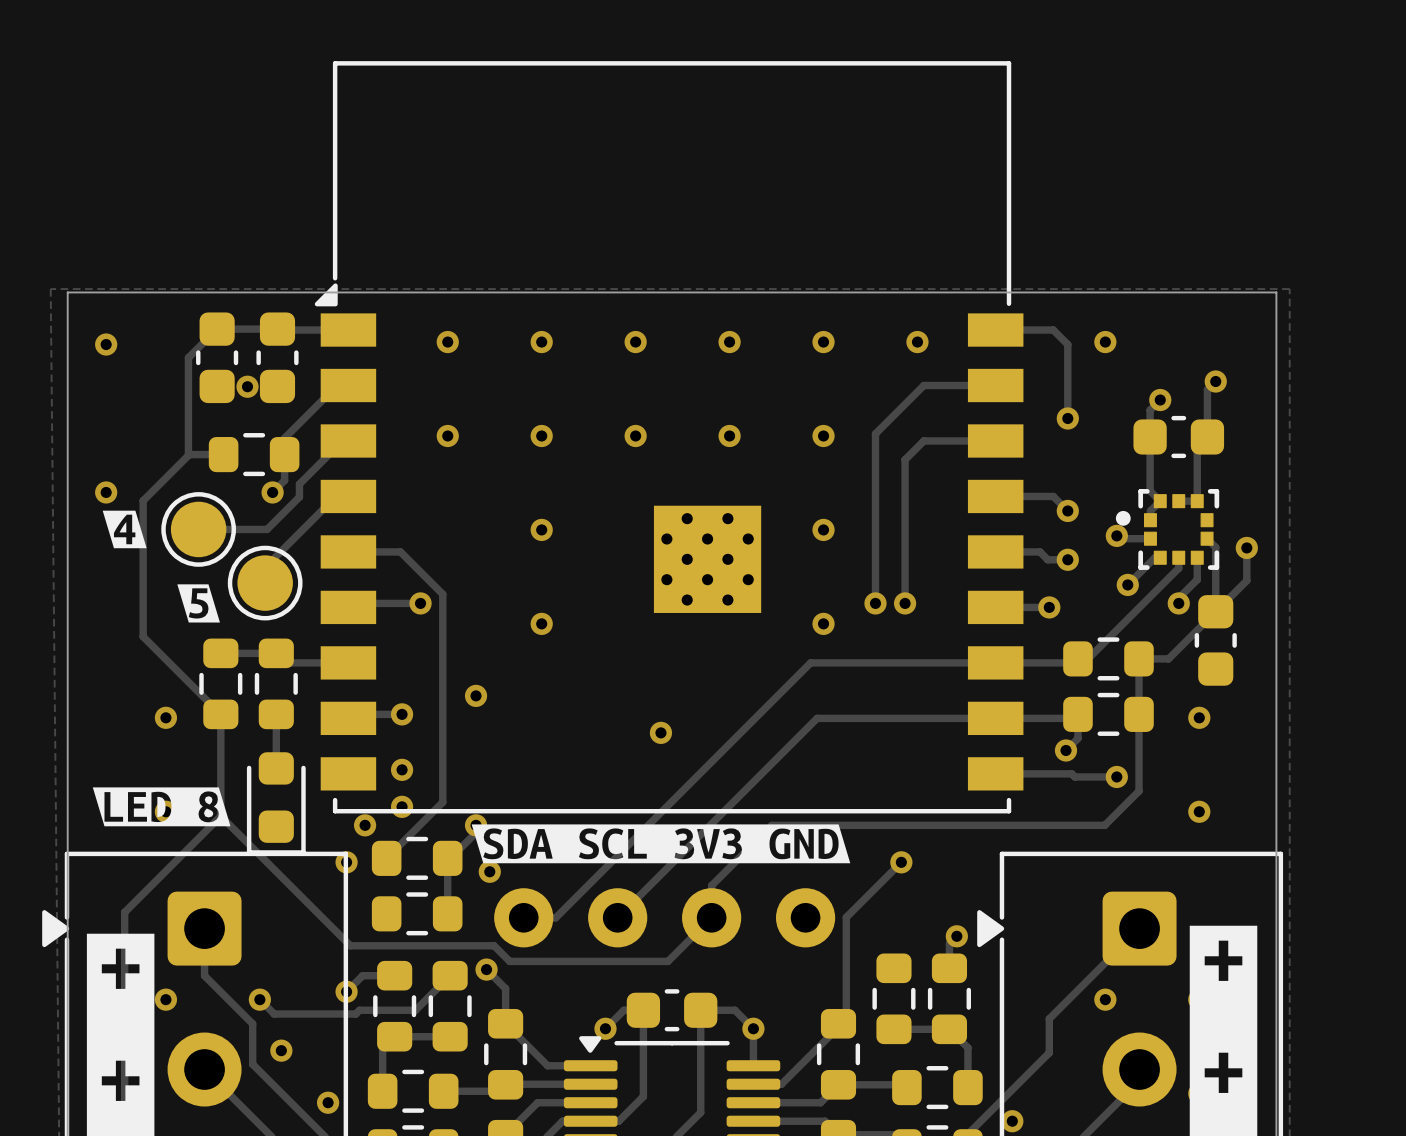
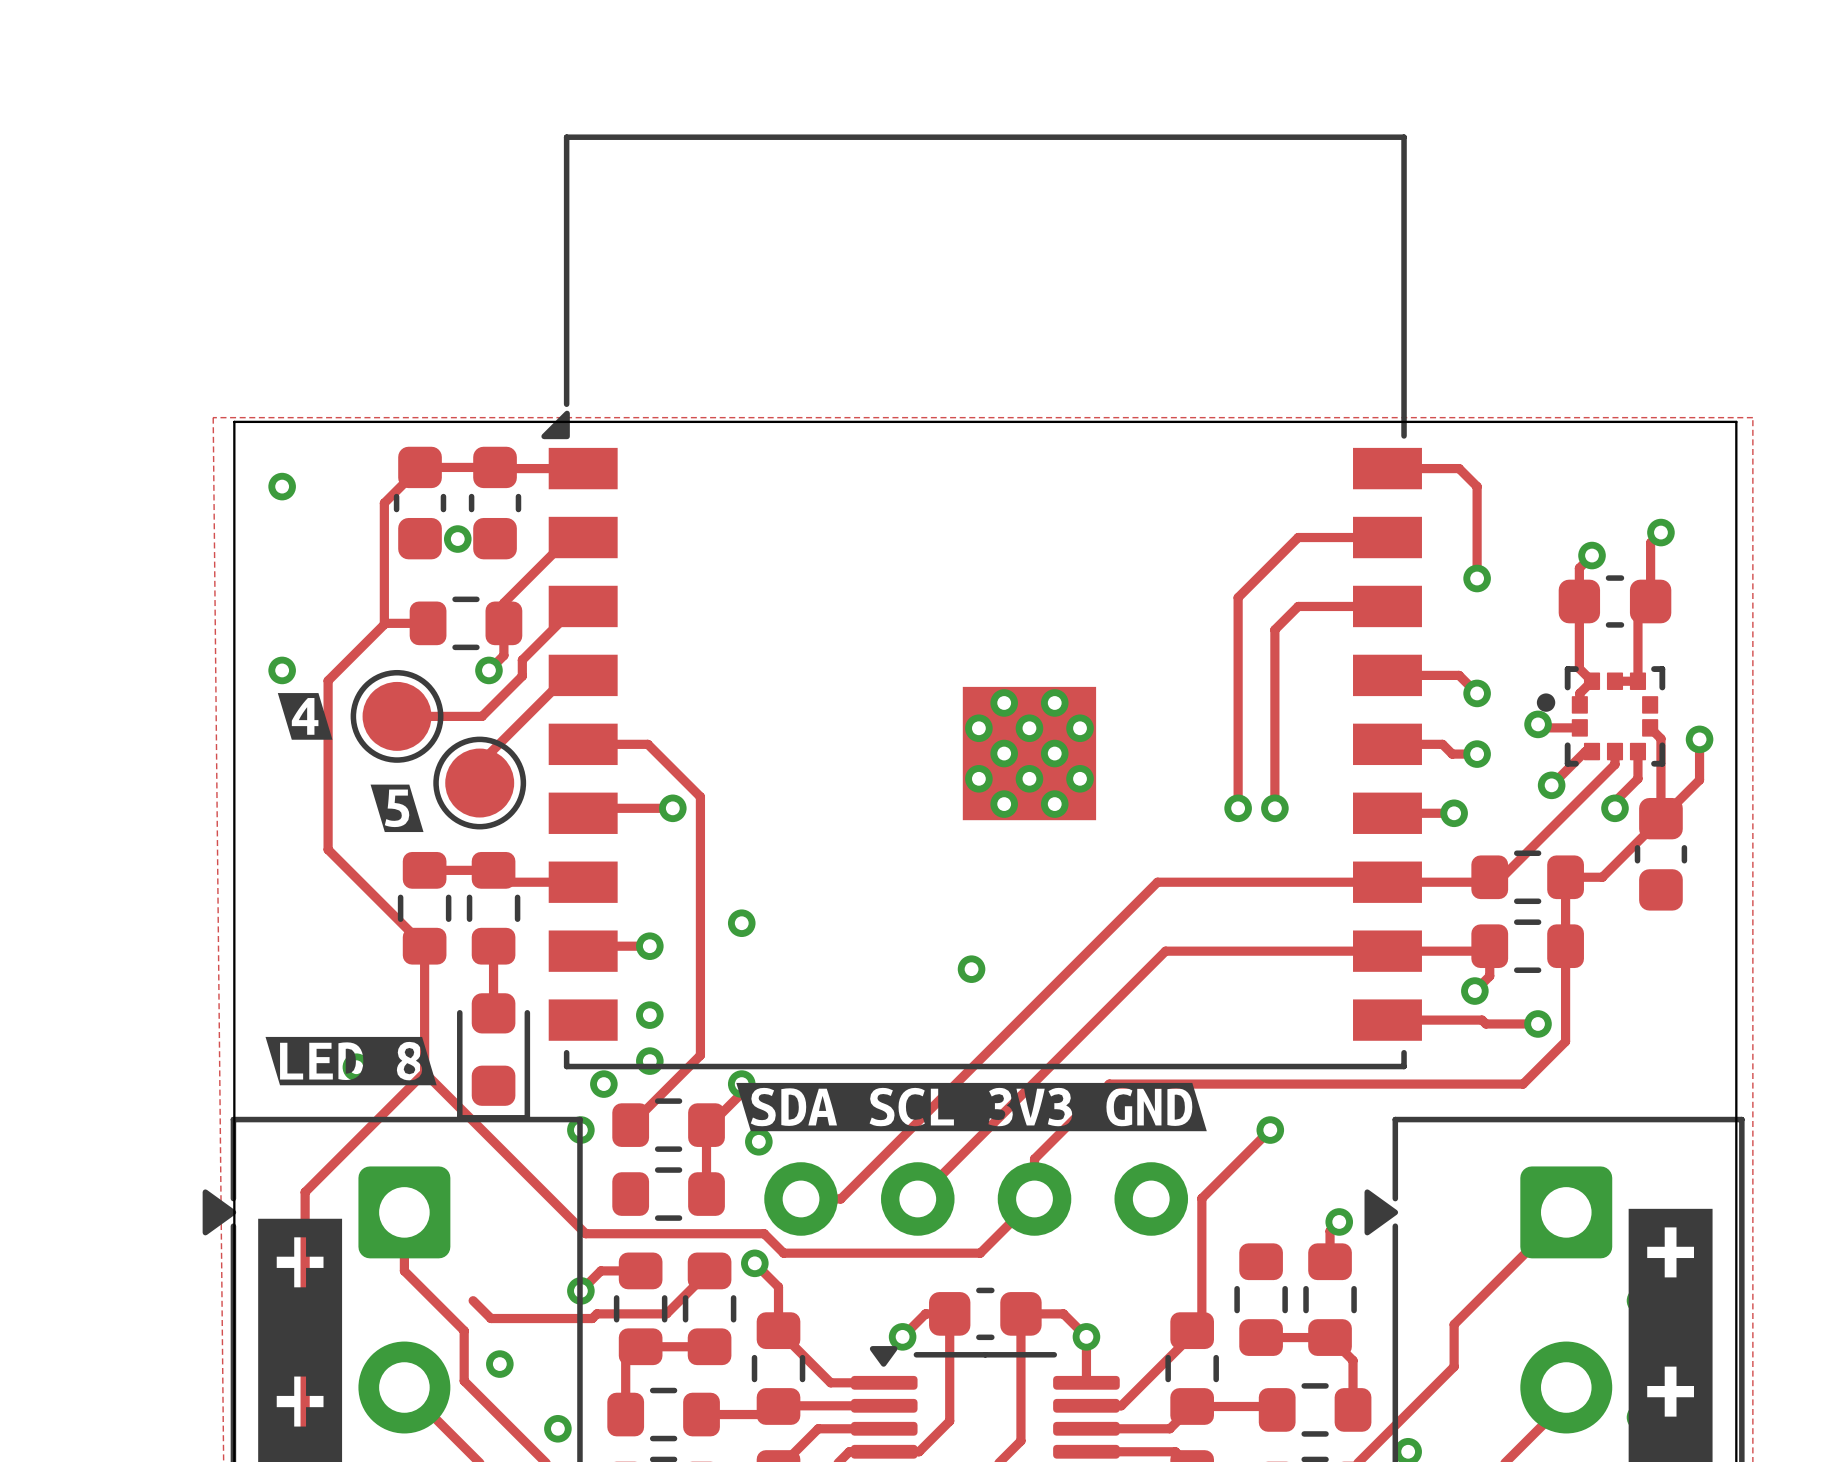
via: (447, 342) -> none
via: (541, 342) -> none
via: (635, 342) -> none
via: (729, 342) -> none
via: (823, 342) -> none
via: (917, 342) -> none
via: (1105, 342) -> none
via: (447, 435) -> none
via: (541, 435) -> none
via: (635, 435) -> none
via: (729, 435) -> none
via: (823, 435) -> none
via: (541, 529) -> none
via: (823, 529) -> none
via: (541, 623) -> none
via: (823, 623) -> none
via: (165, 717) -> none
via: (1199, 717) -> none
via: (1199, 811) -> none
via: (165, 999) -> none
via: (259, 999) -> none
via: (1105, 999) -> none

